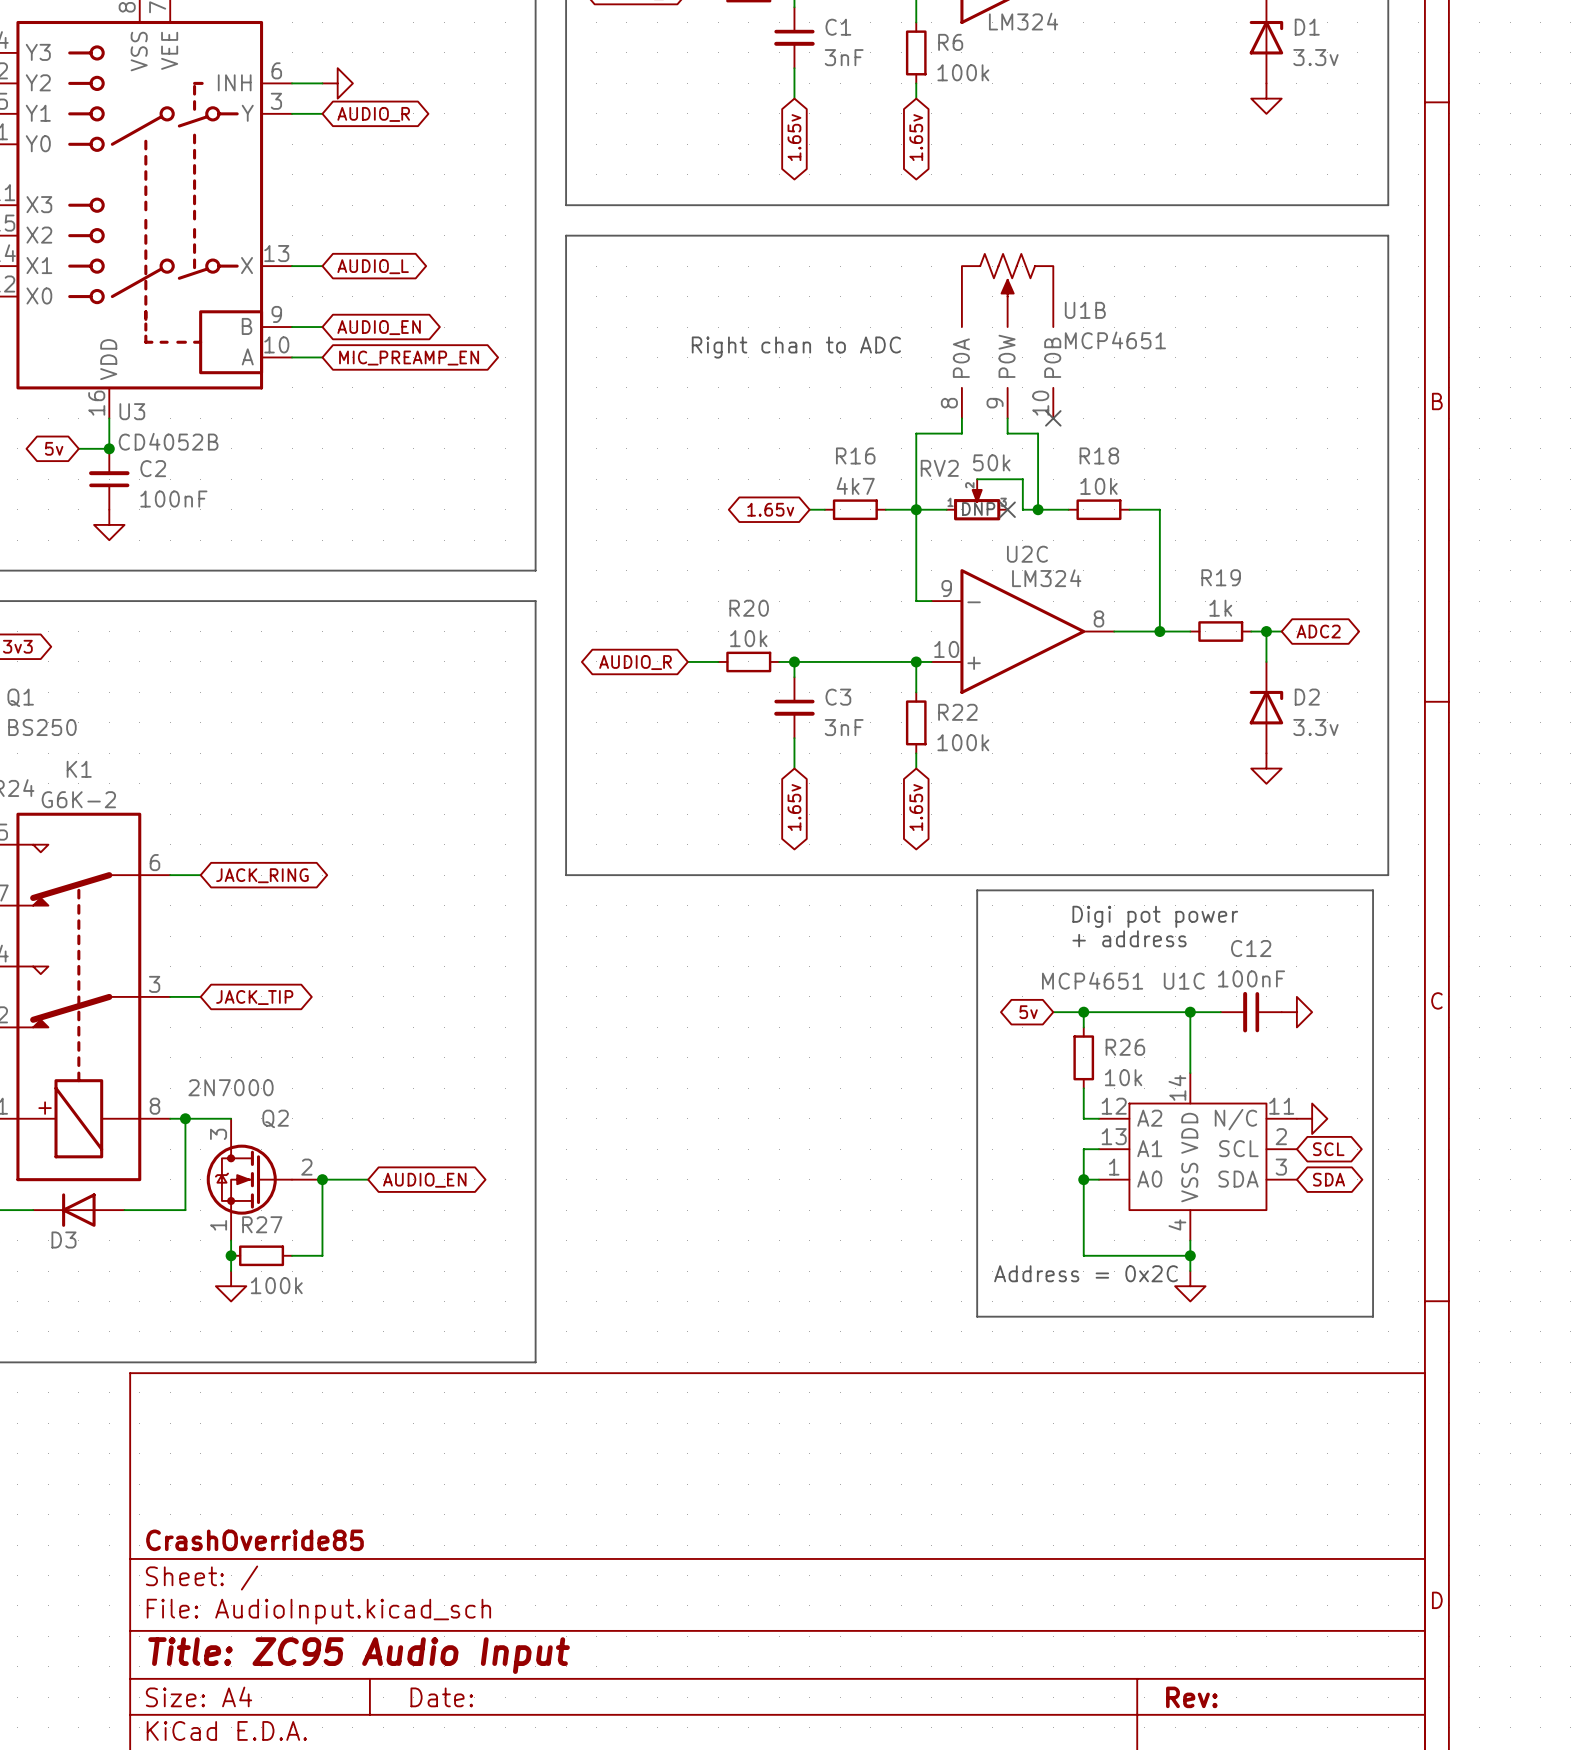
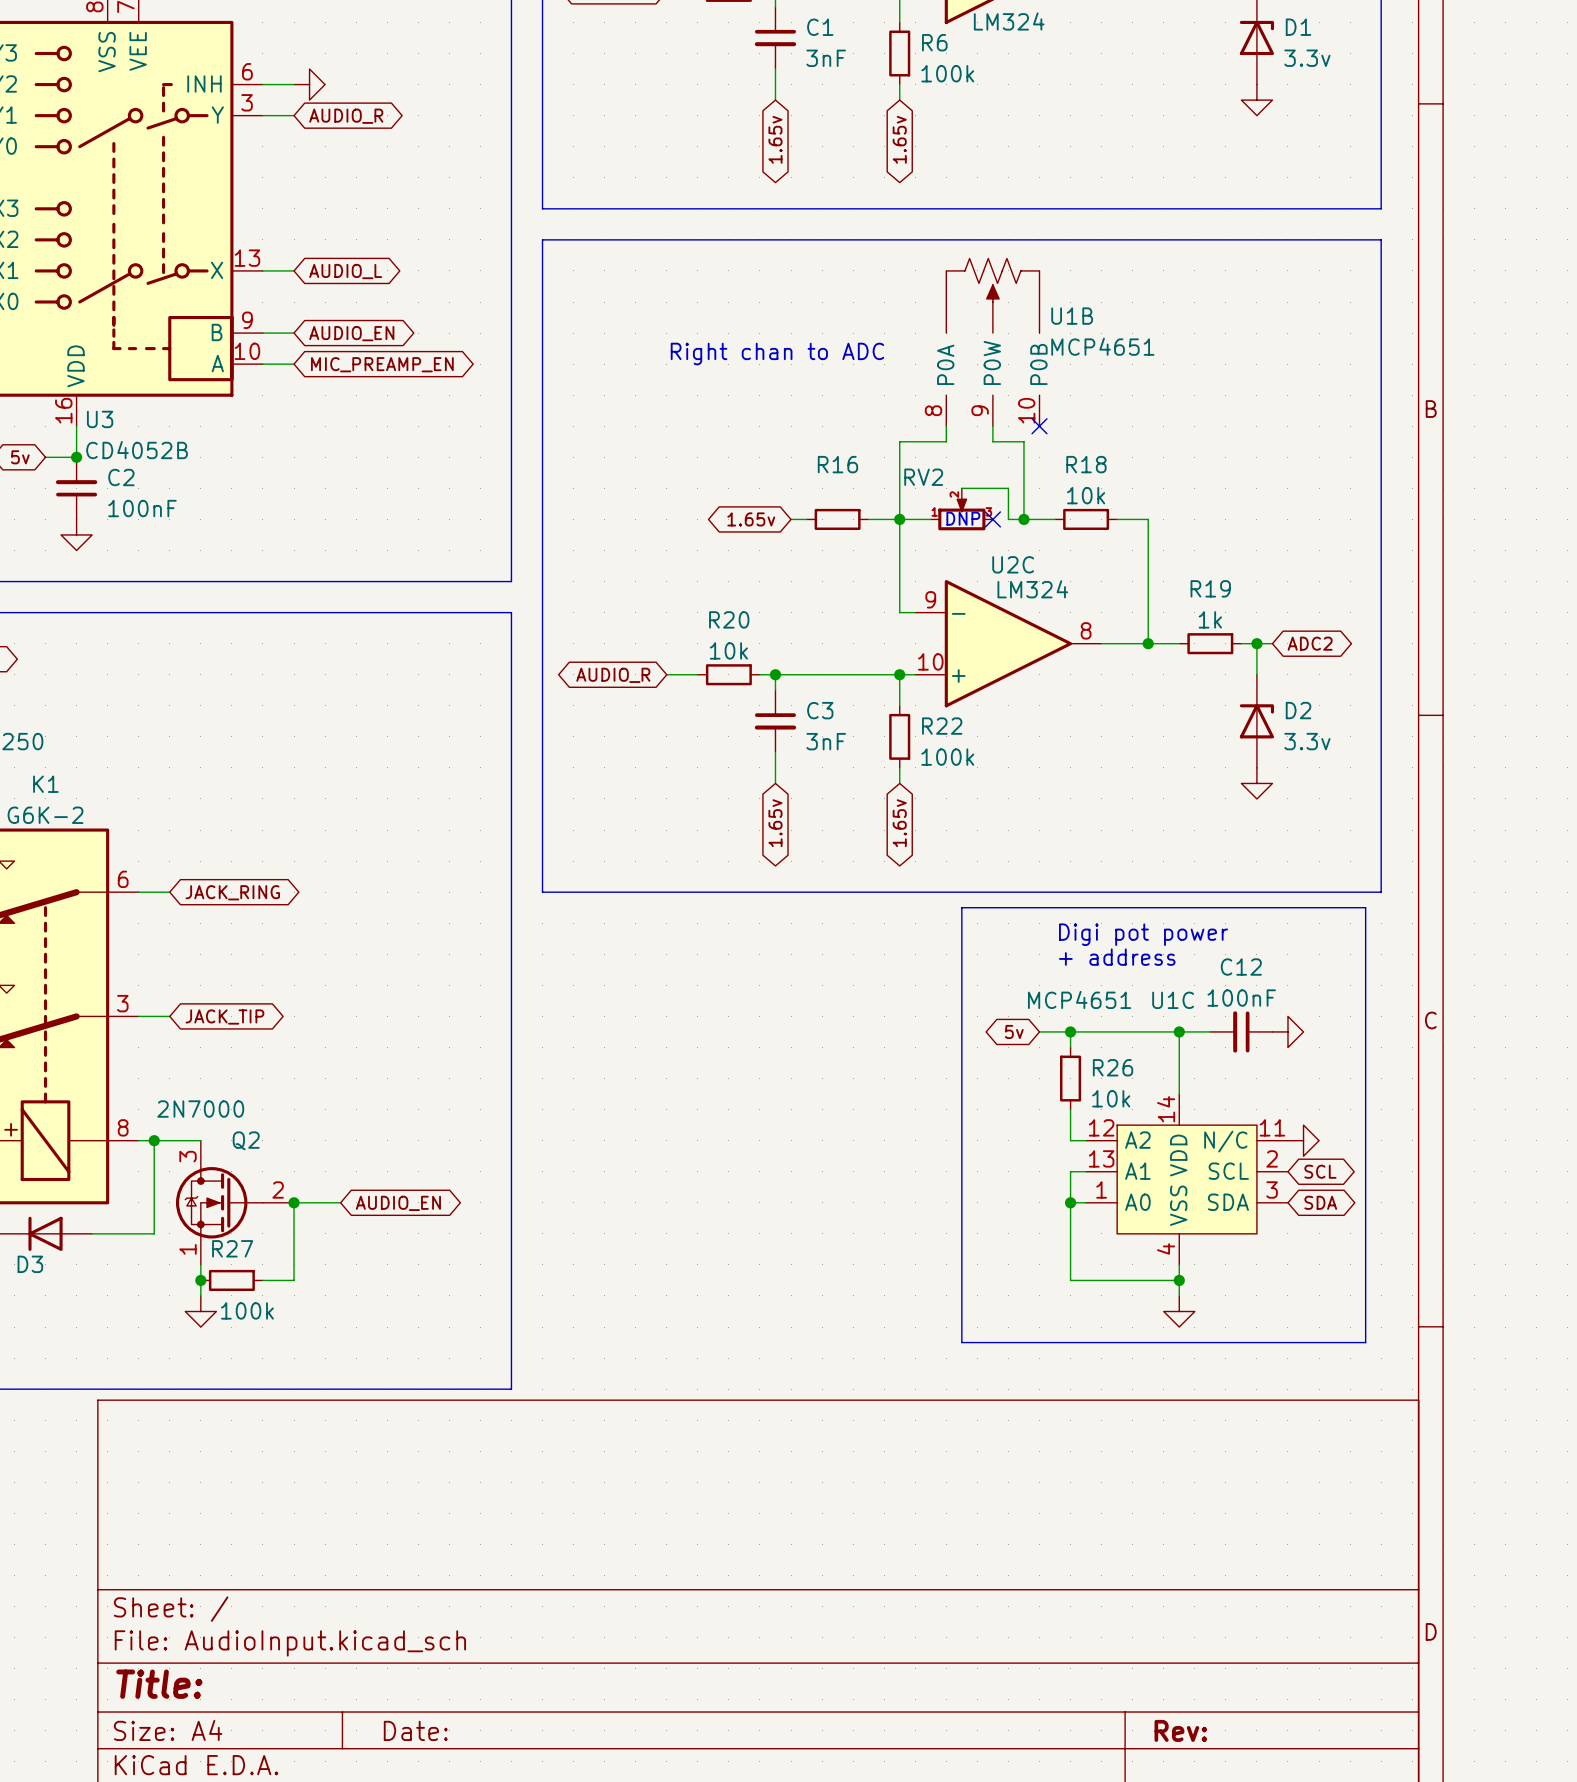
RV2 value: 50k (991, 462) -> none
R16 value: 4k7 (855, 486) -> none
text: Address = 0x2C (1086, 1273) -> none
title block: CrashOverride85 (254, 1540) -> none
title block: Title: ZC95 Audio Input (359, 1655) -> Title: (159, 1684)

